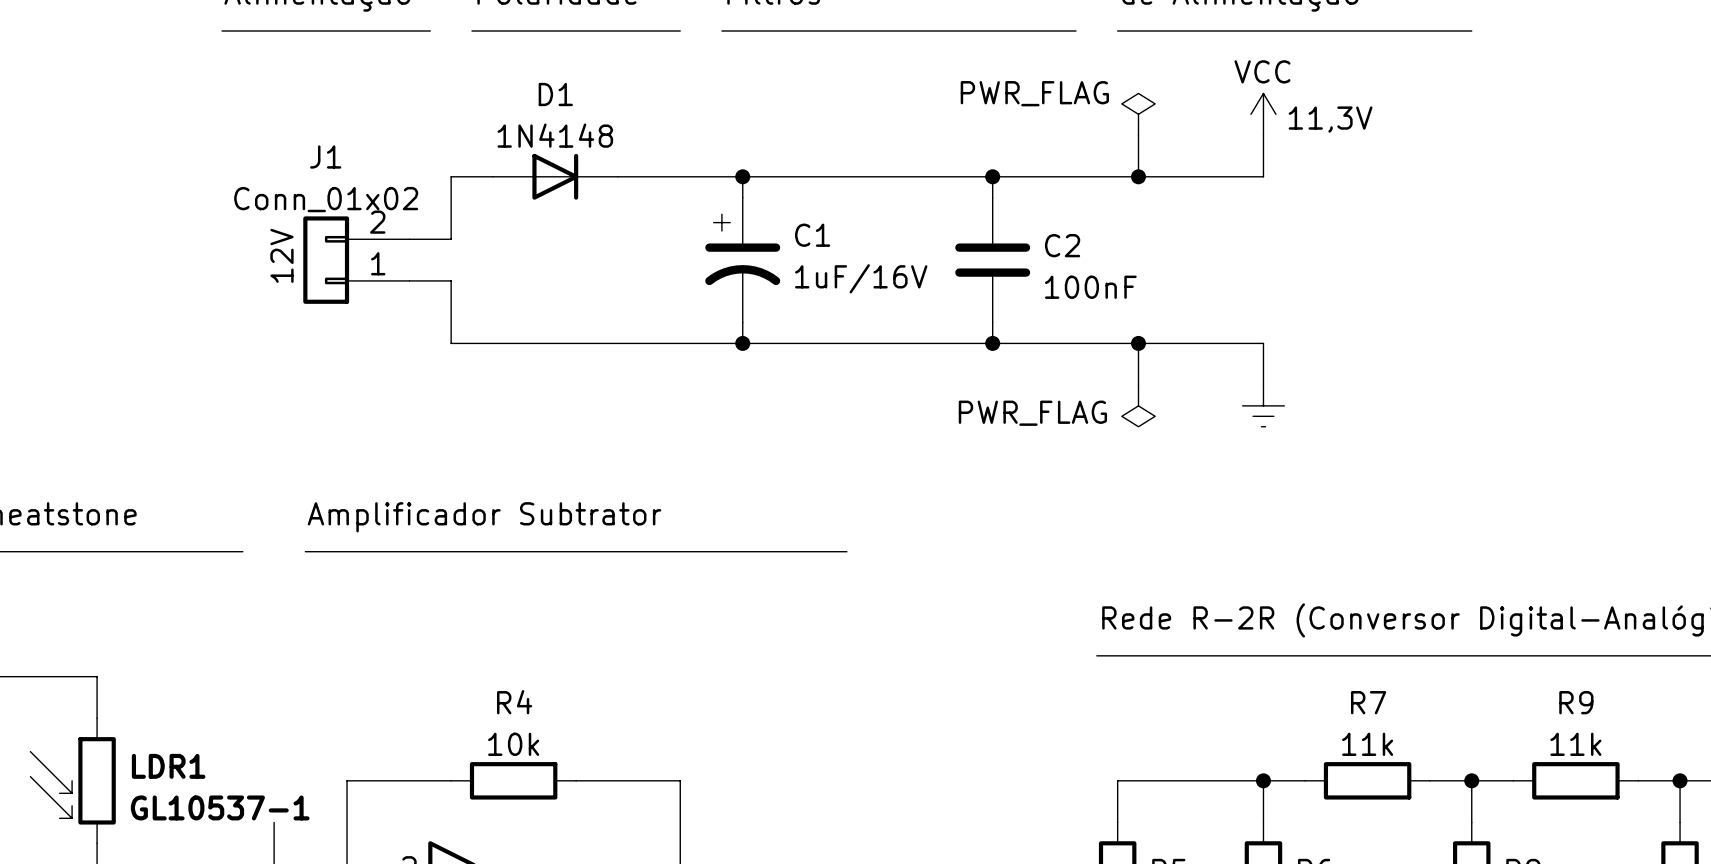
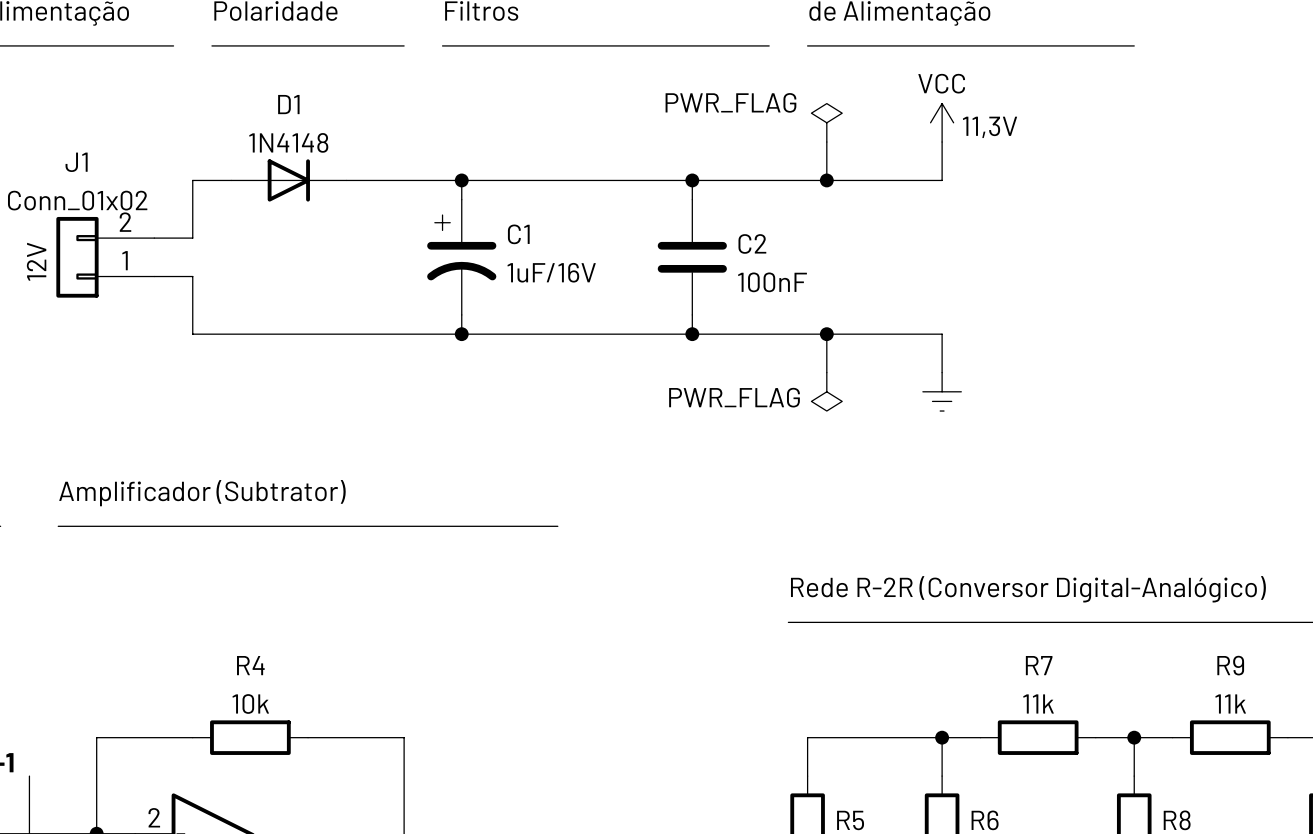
text: Amplificador Subtrator (484, 517) -> Amplificador (Subtrator) (202, 493)

